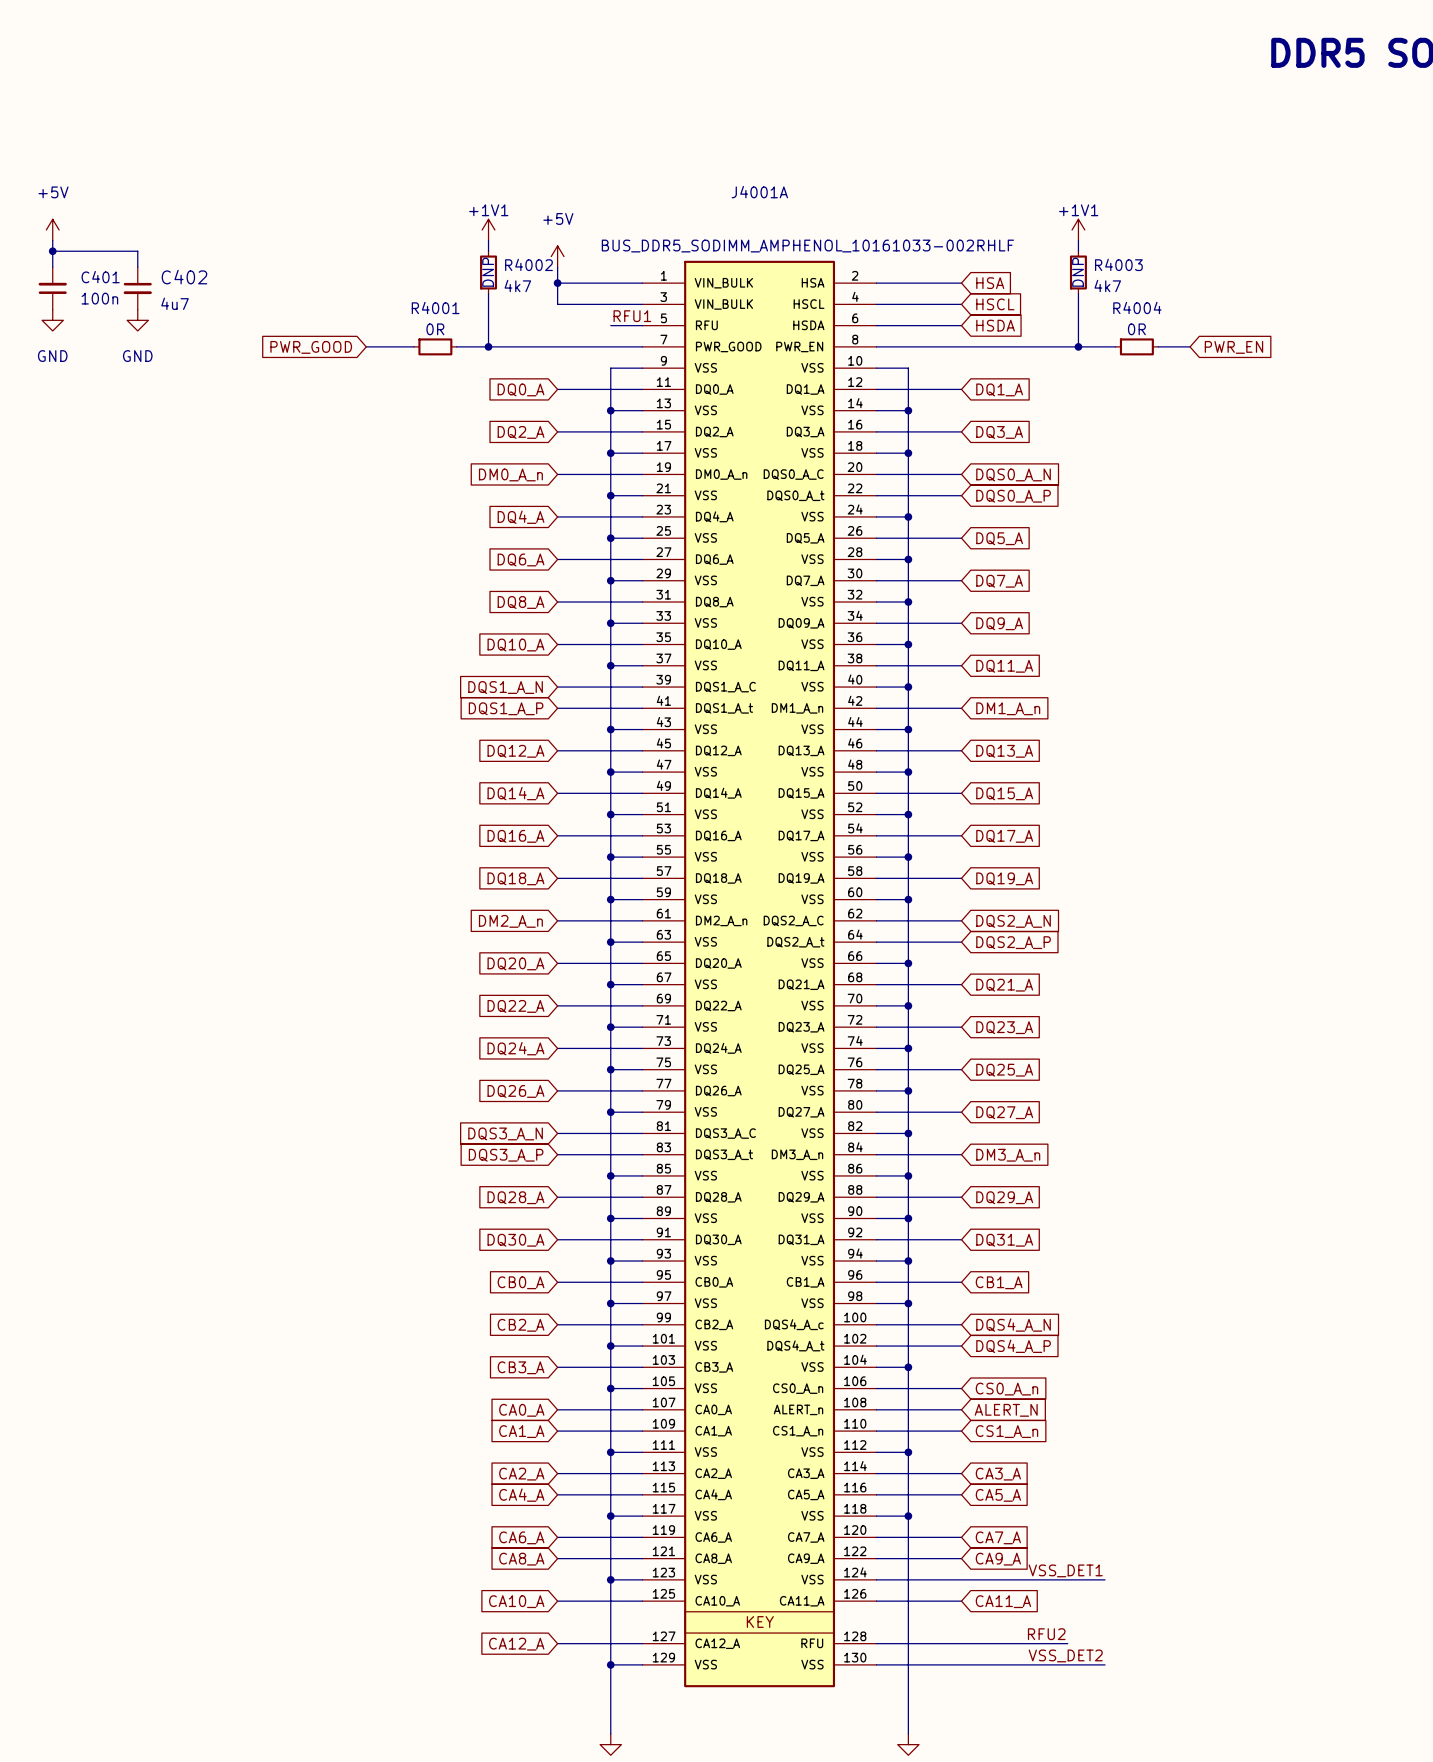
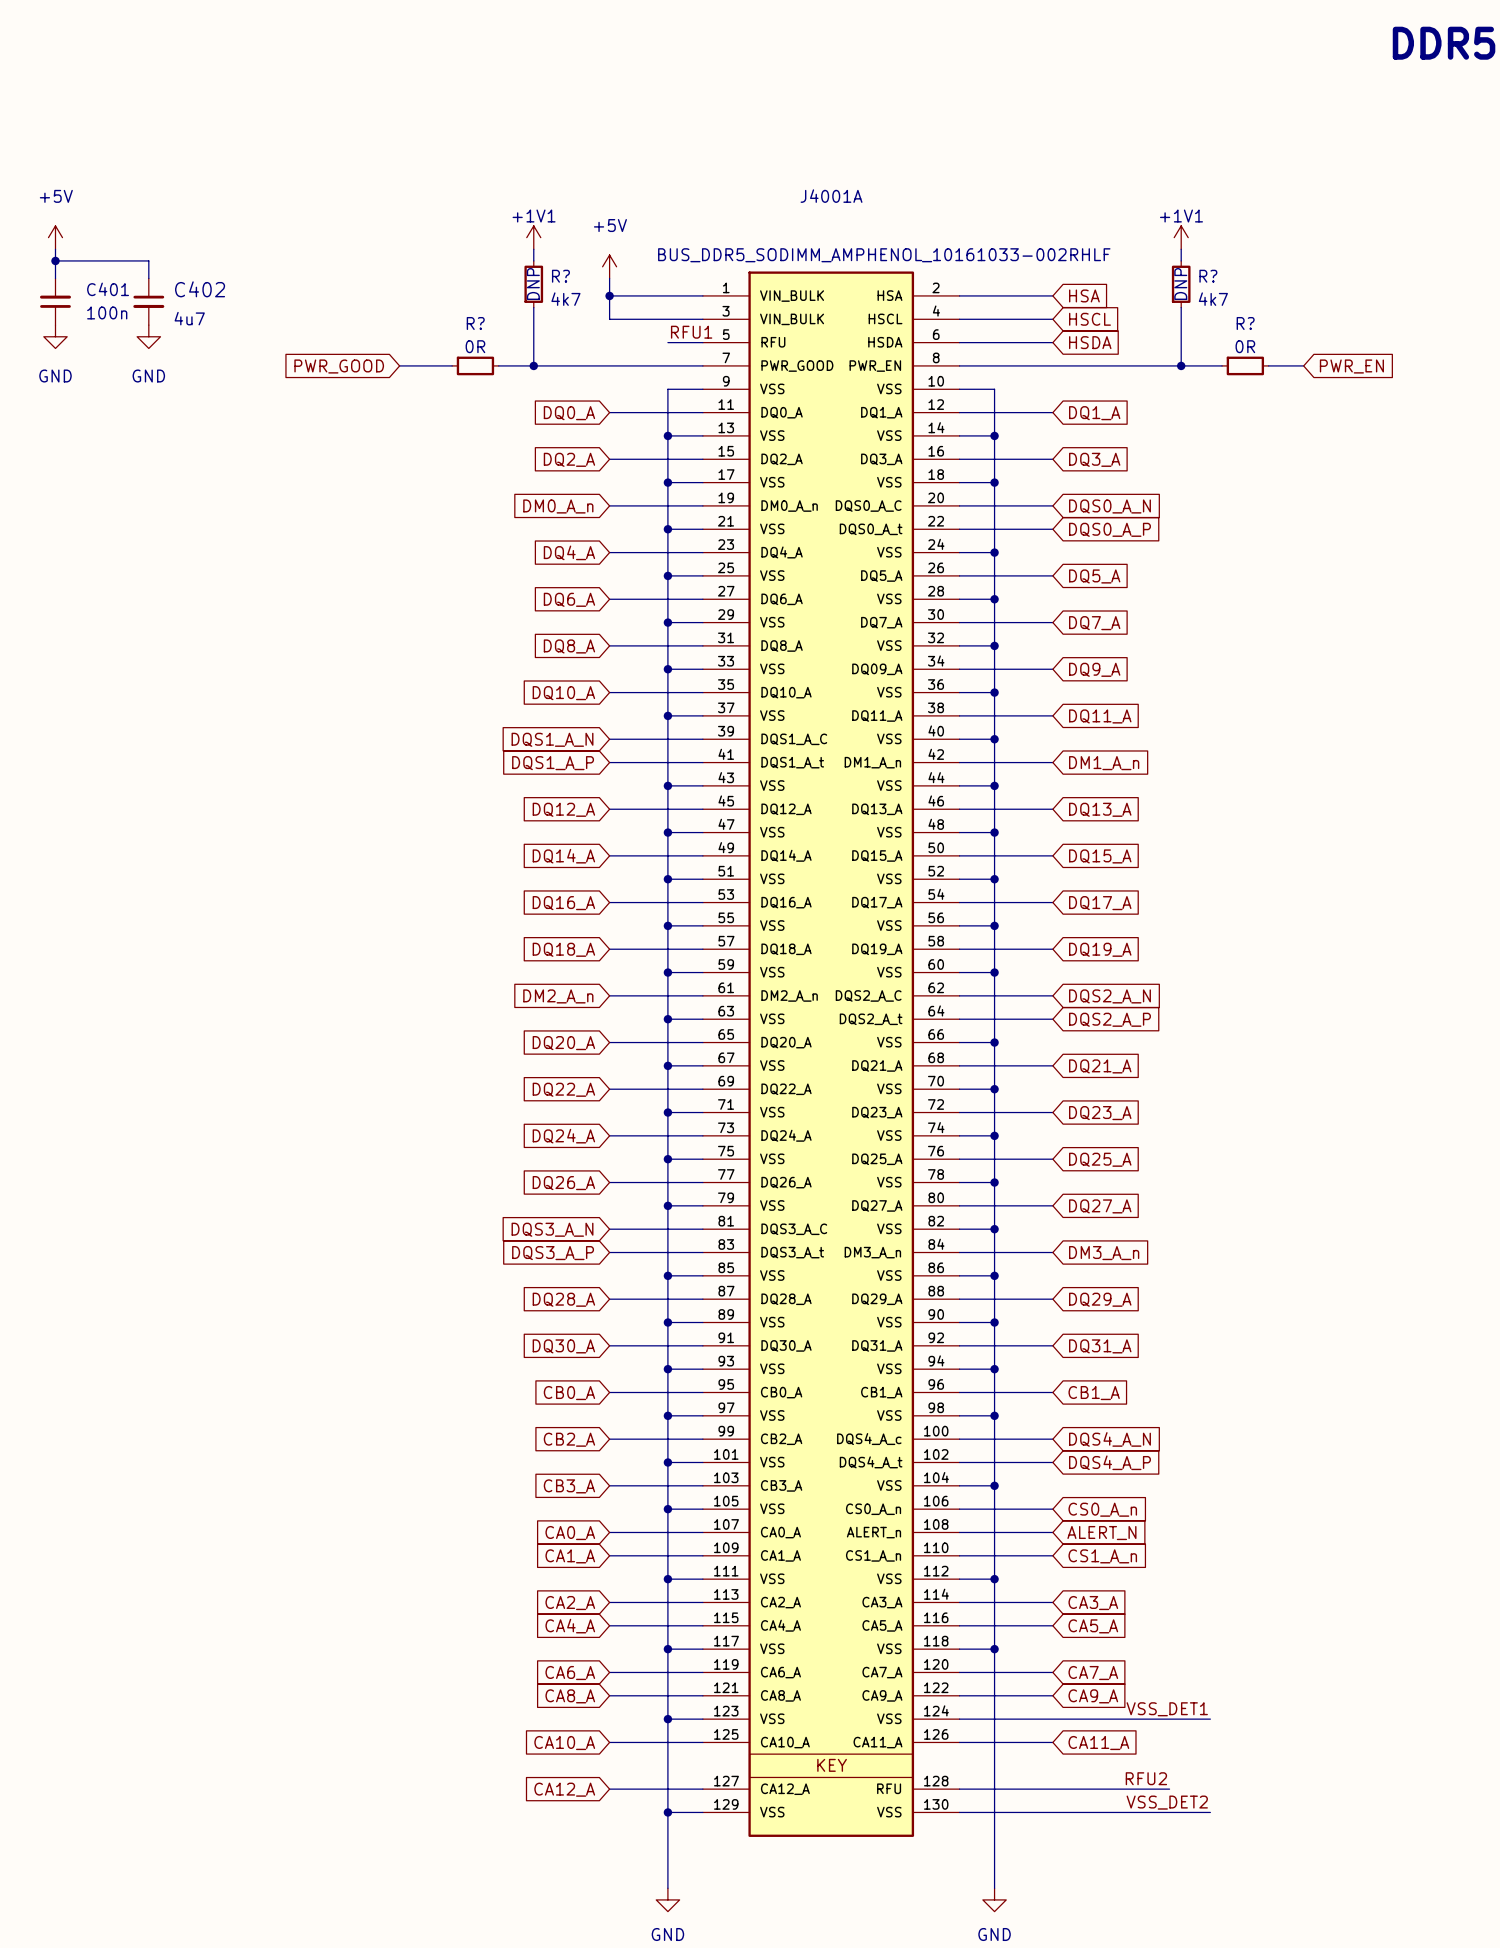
R4002 name: R4002 (528, 264) -> R? (560, 276)
R4003 name: R4003 (1118, 264) -> R? (1208, 276)
R4001 name: R4001 (435, 307) -> R? (475, 323)
R4004 name: R4004 (1137, 307) -> R? (1245, 323)

